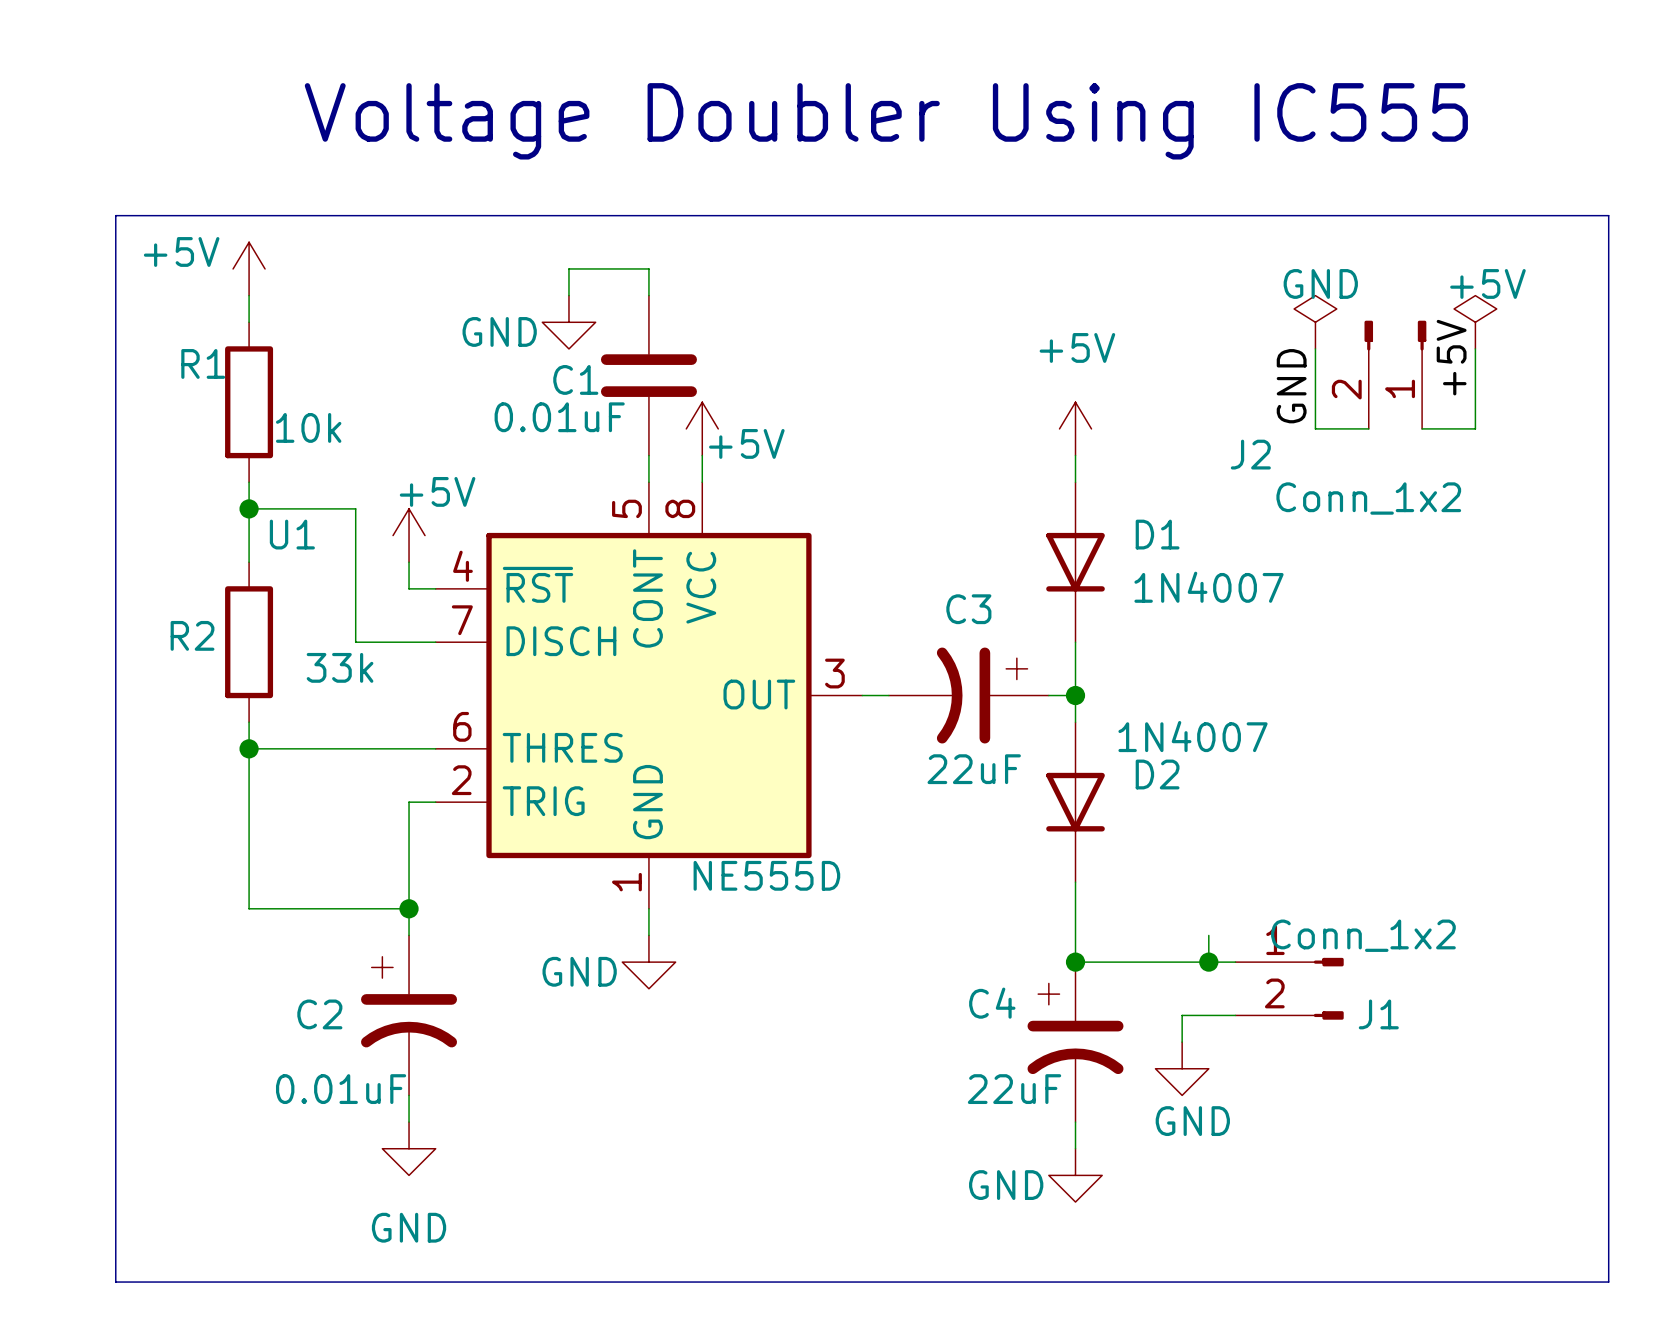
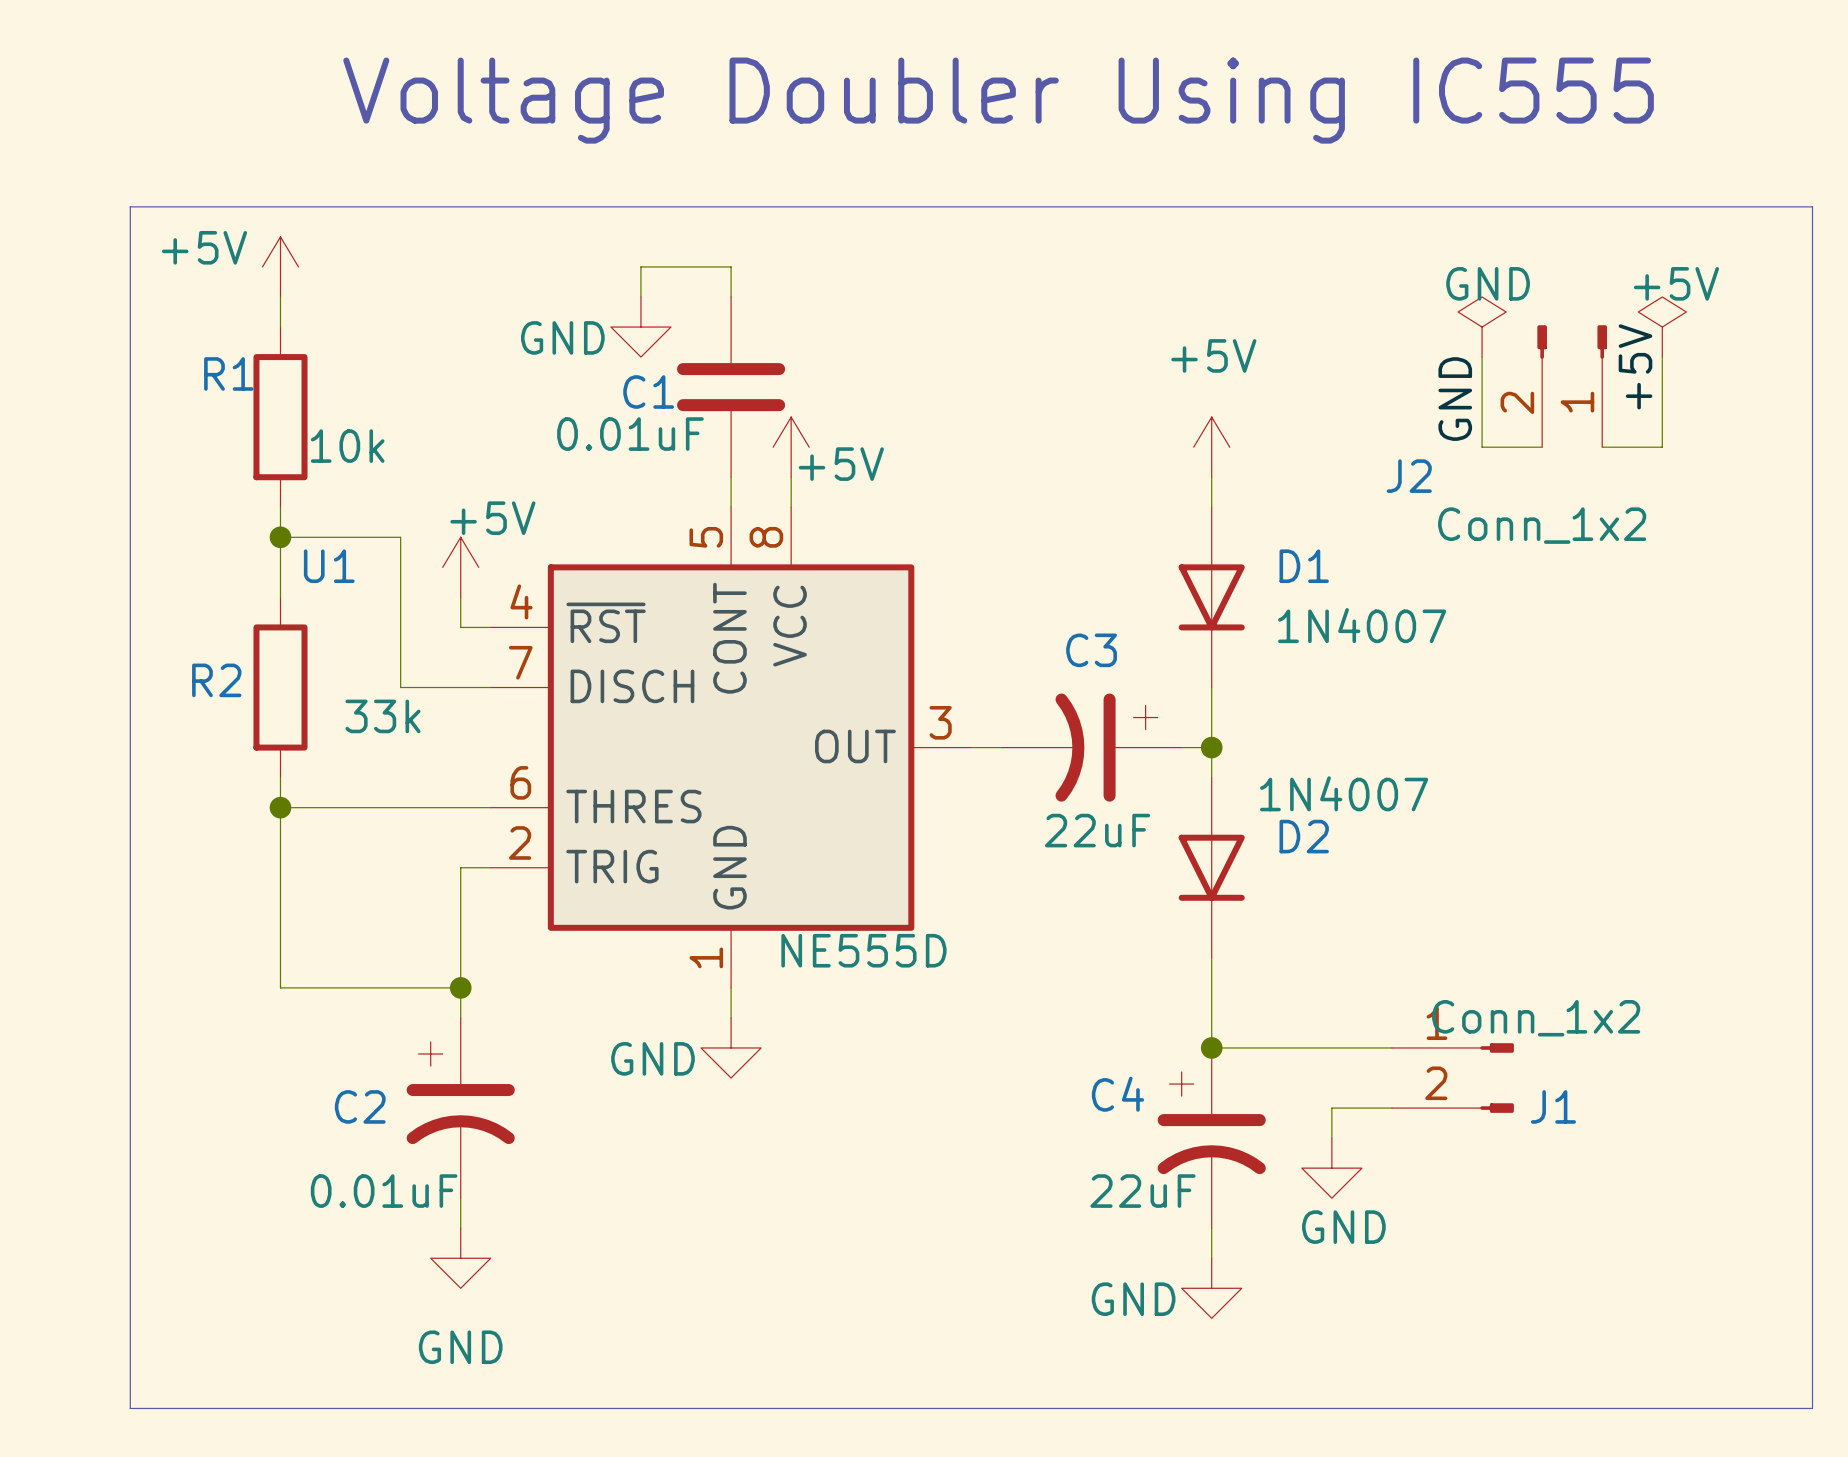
wire: (1208, 935) (1208, 962) -> none
junction: (1208, 962) -> none

